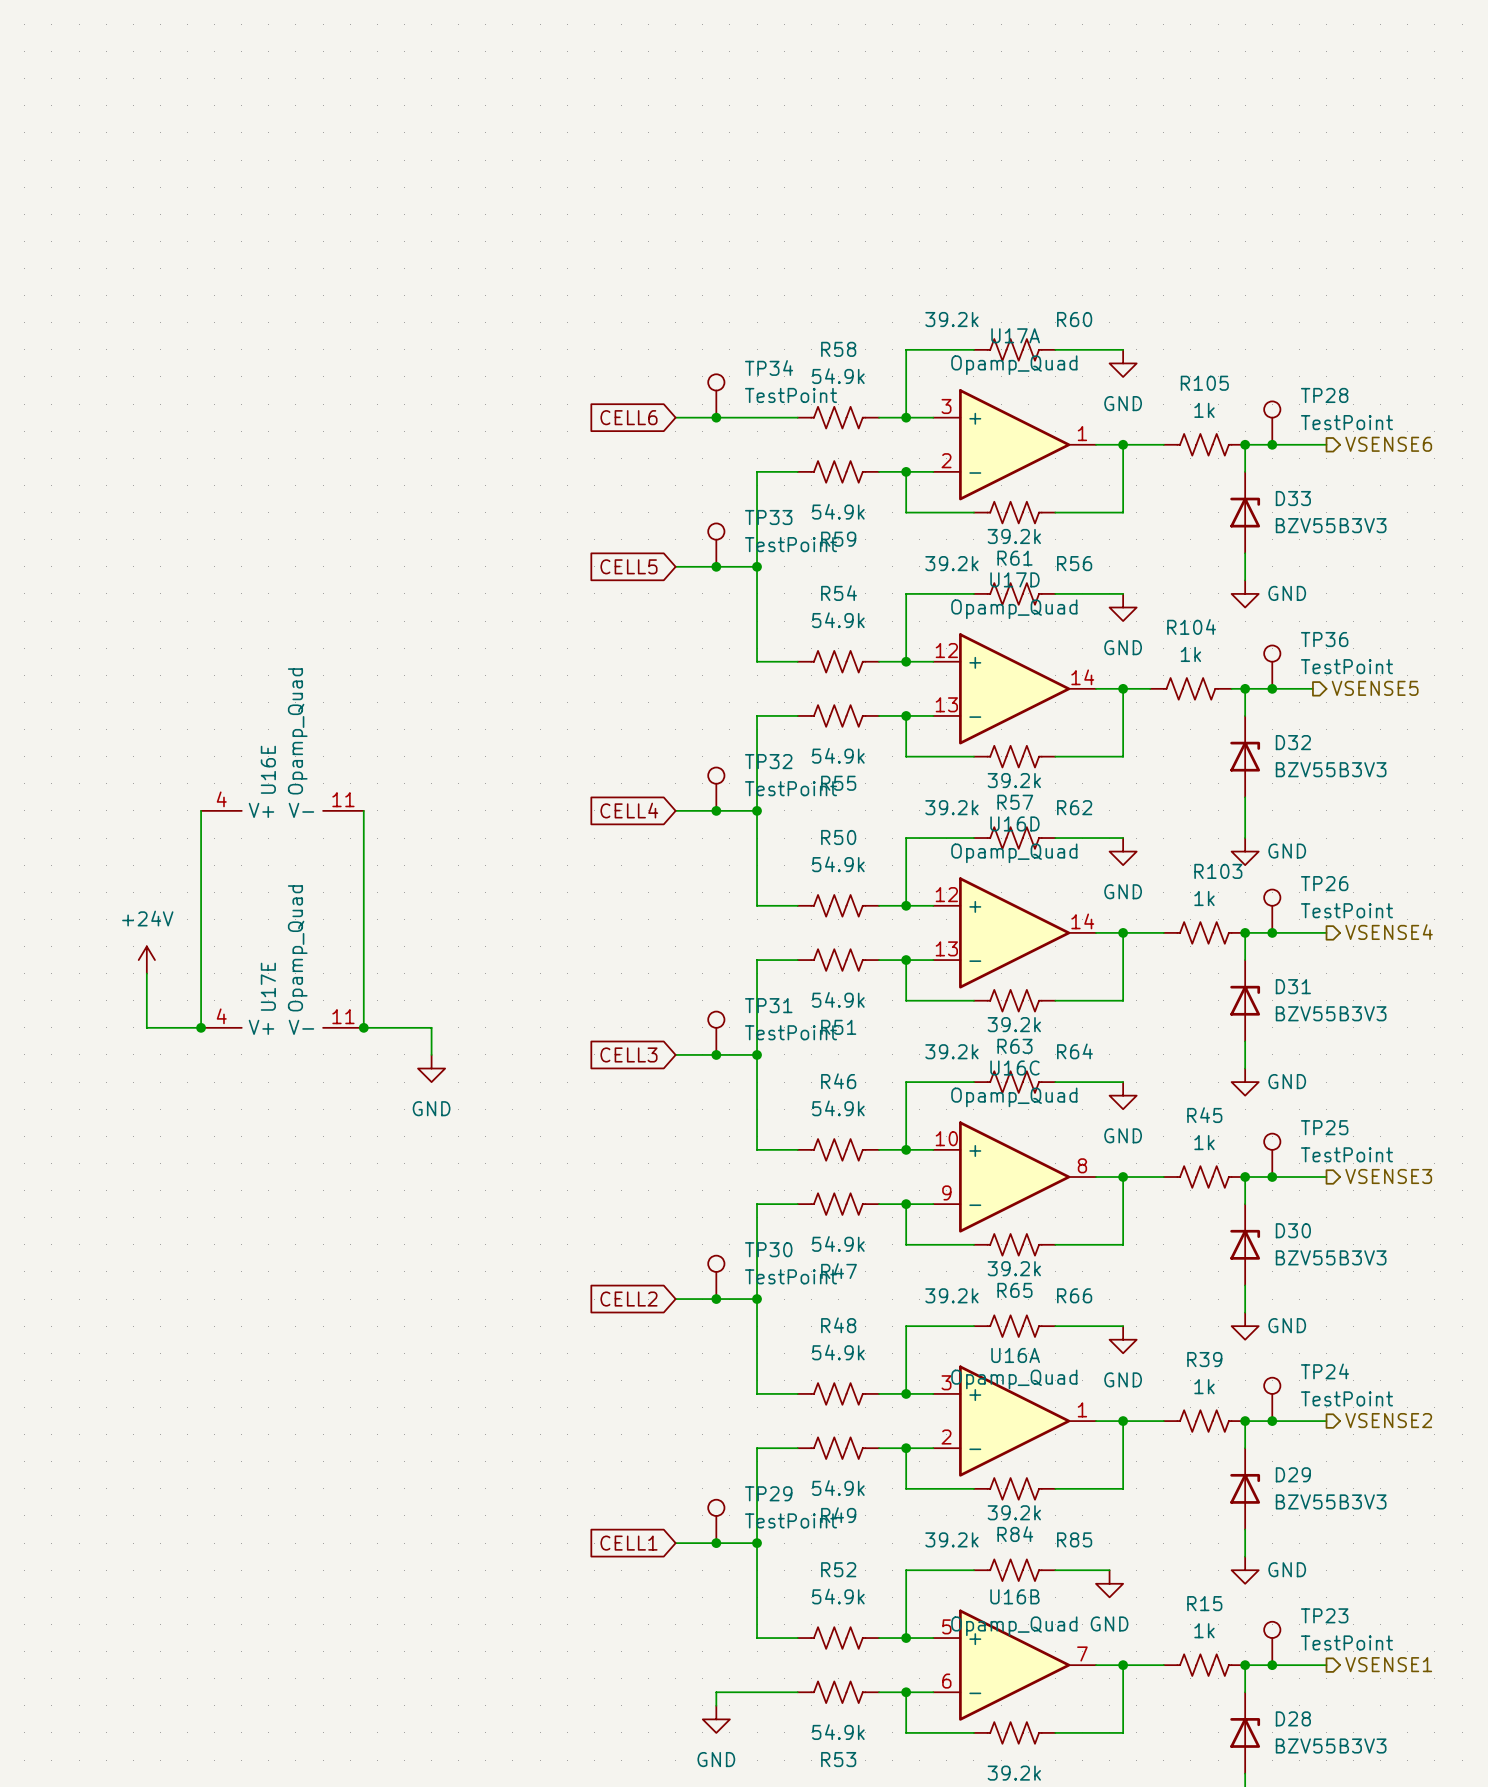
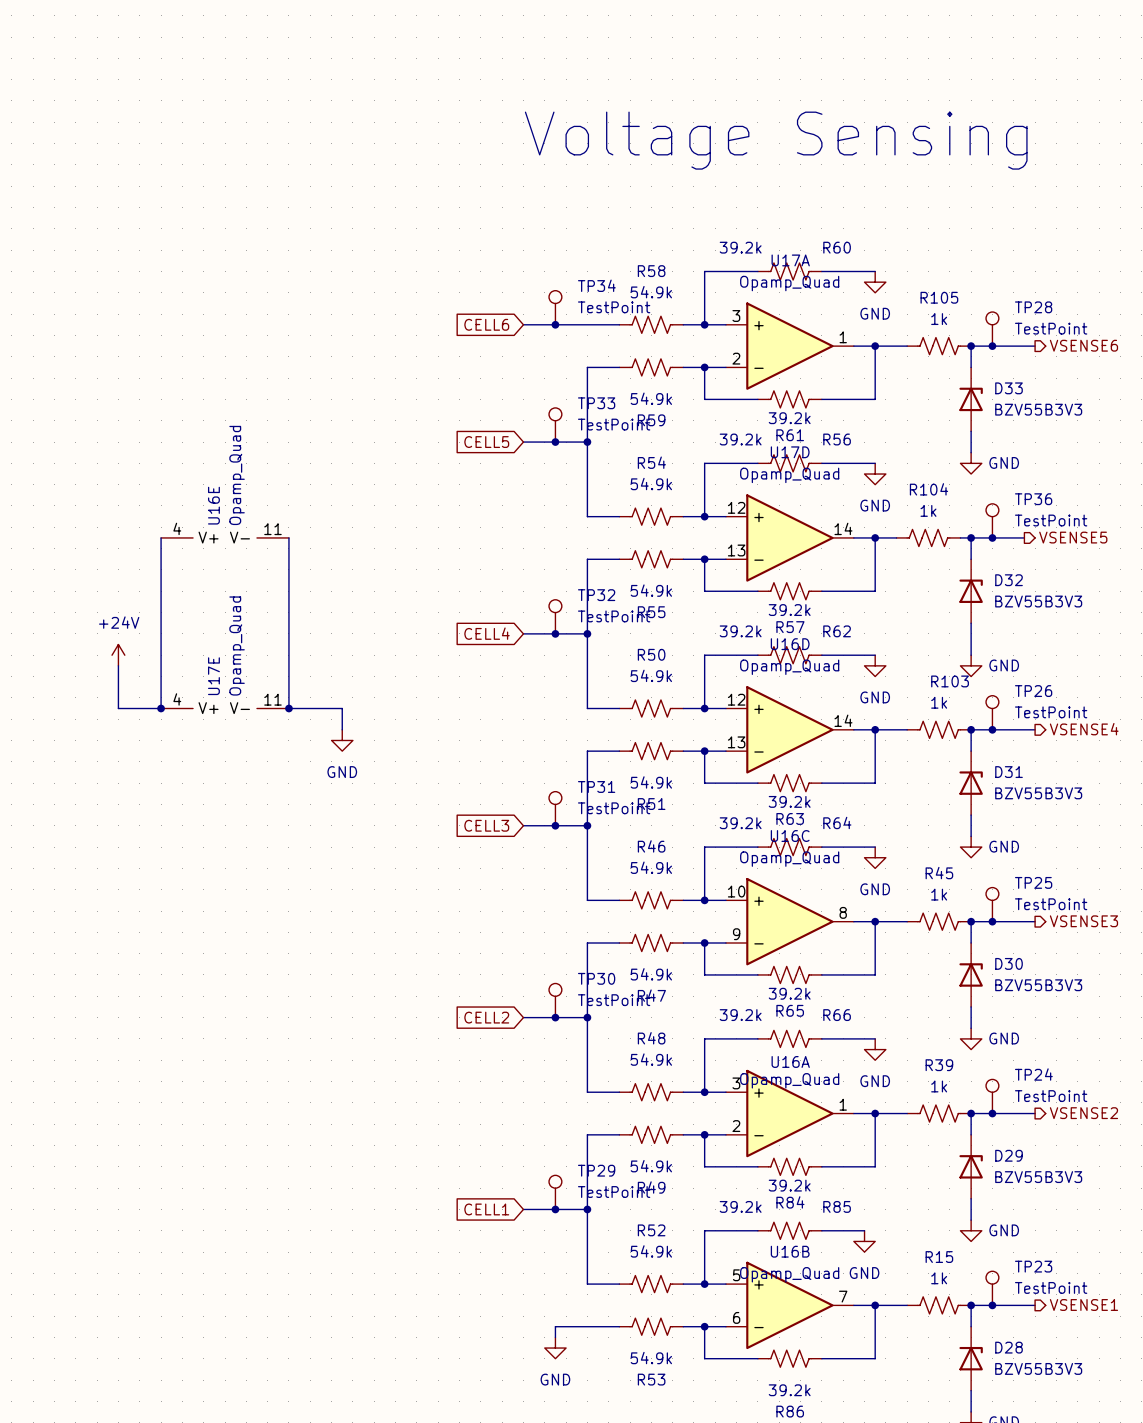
text: none -> Voltage Sensing (776, 140)
wire: (201, 810) (201, 1027) (146, 1027) (146, 973) -> (161, 537) (161, 708) (118, 708) (118, 665)
U16E position: (282, 810) -> (225, 537)
wire: (363, 810) (363, 1027) (431, 1027) (431, 1054) -> (288, 537) (288, 708) (342, 708) (342, 729)
junction: none -> (161, 708)
junction: none -> (288, 708)
power symbol position: +24V (146, 960) -> +24V (118, 655)
junction: (201, 1027) -> none
U17E position: (282, 1027) -> (225, 708)
junction: (363, 1027) -> none
power symbol position: GND (431, 1068) -> GND (342, 740)

